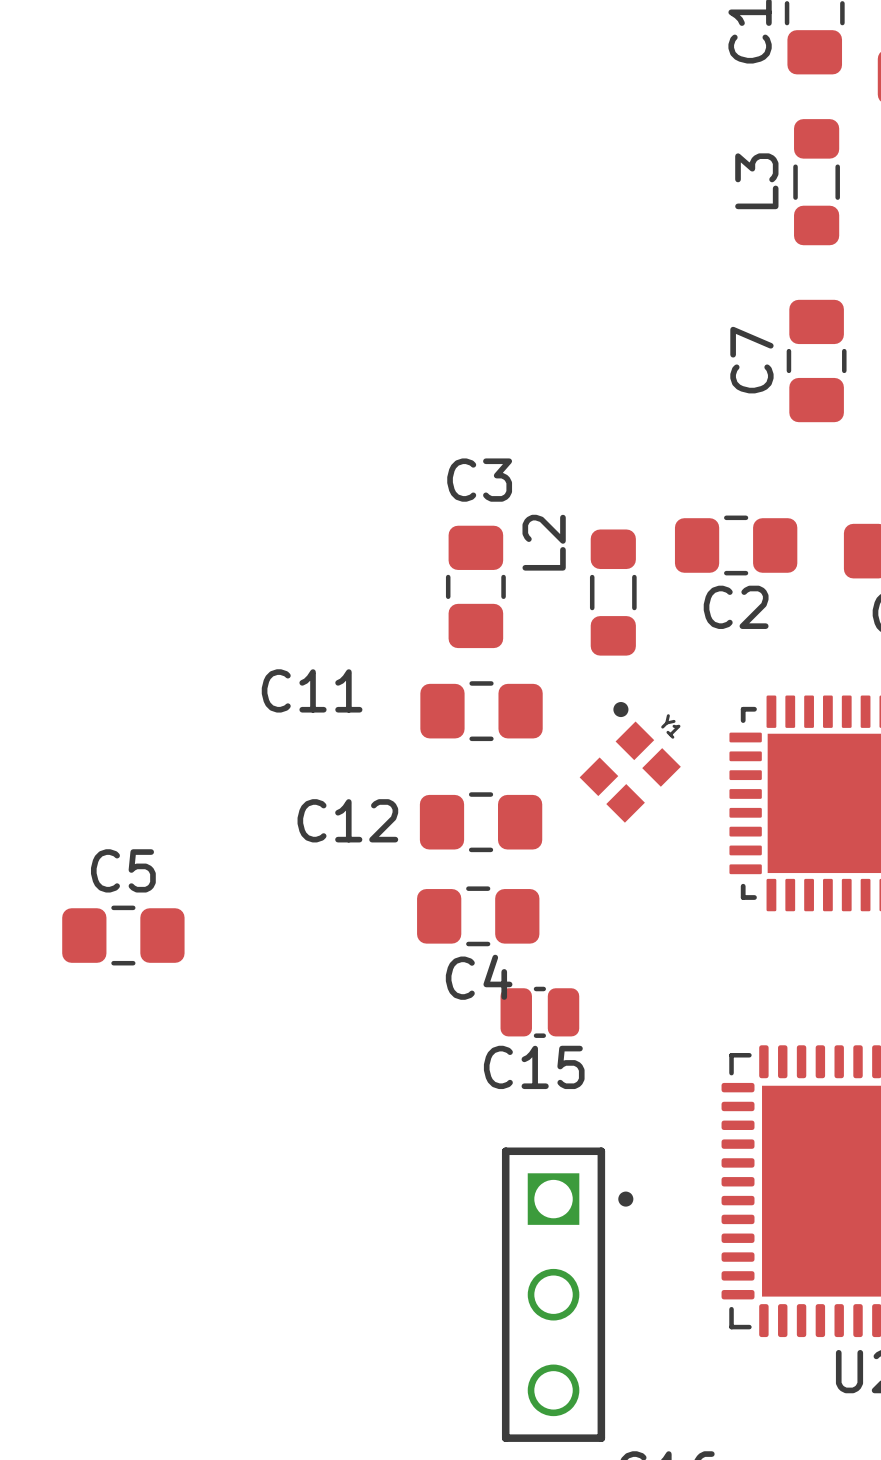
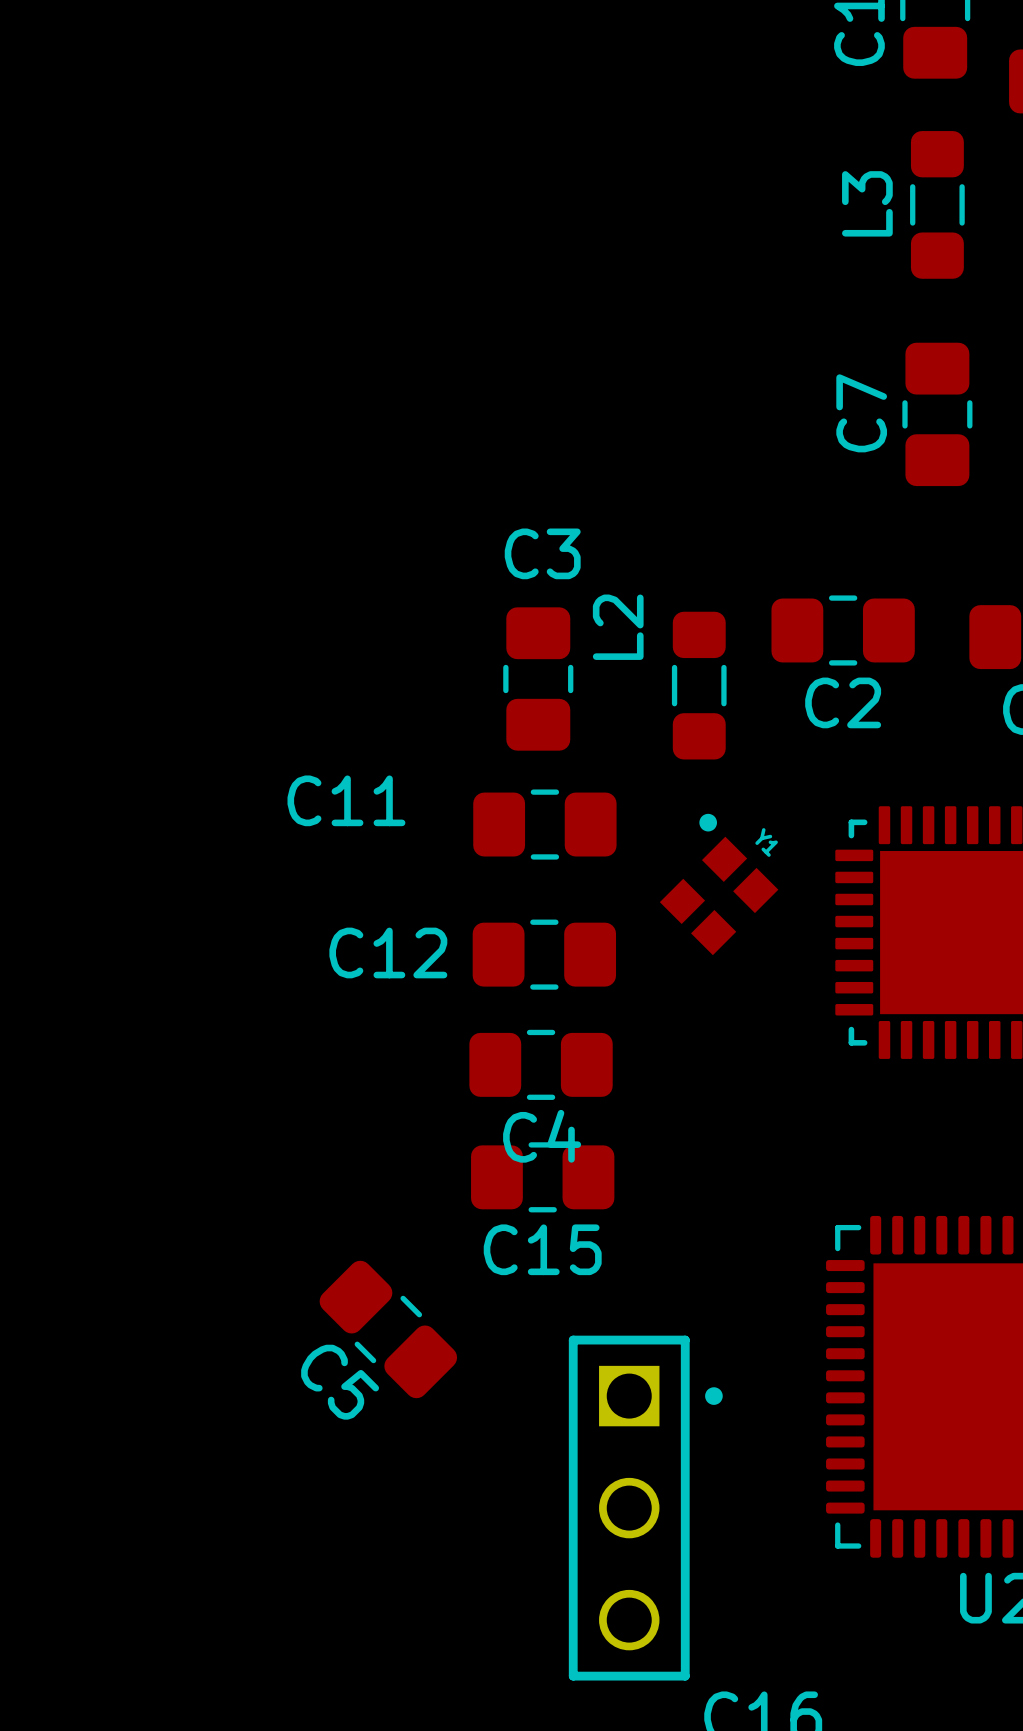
C5 name position: C5 (123, 870) -> C5 (340, 1382)
C5 rotation: 0° (123, 935) -> 45° clockwise (388, 1329)
C5 position: (123, 935) -> (388, 1329)
C15 footprint: [500, 986, 580, 1038] -> [471, 1142, 615, 1213]

